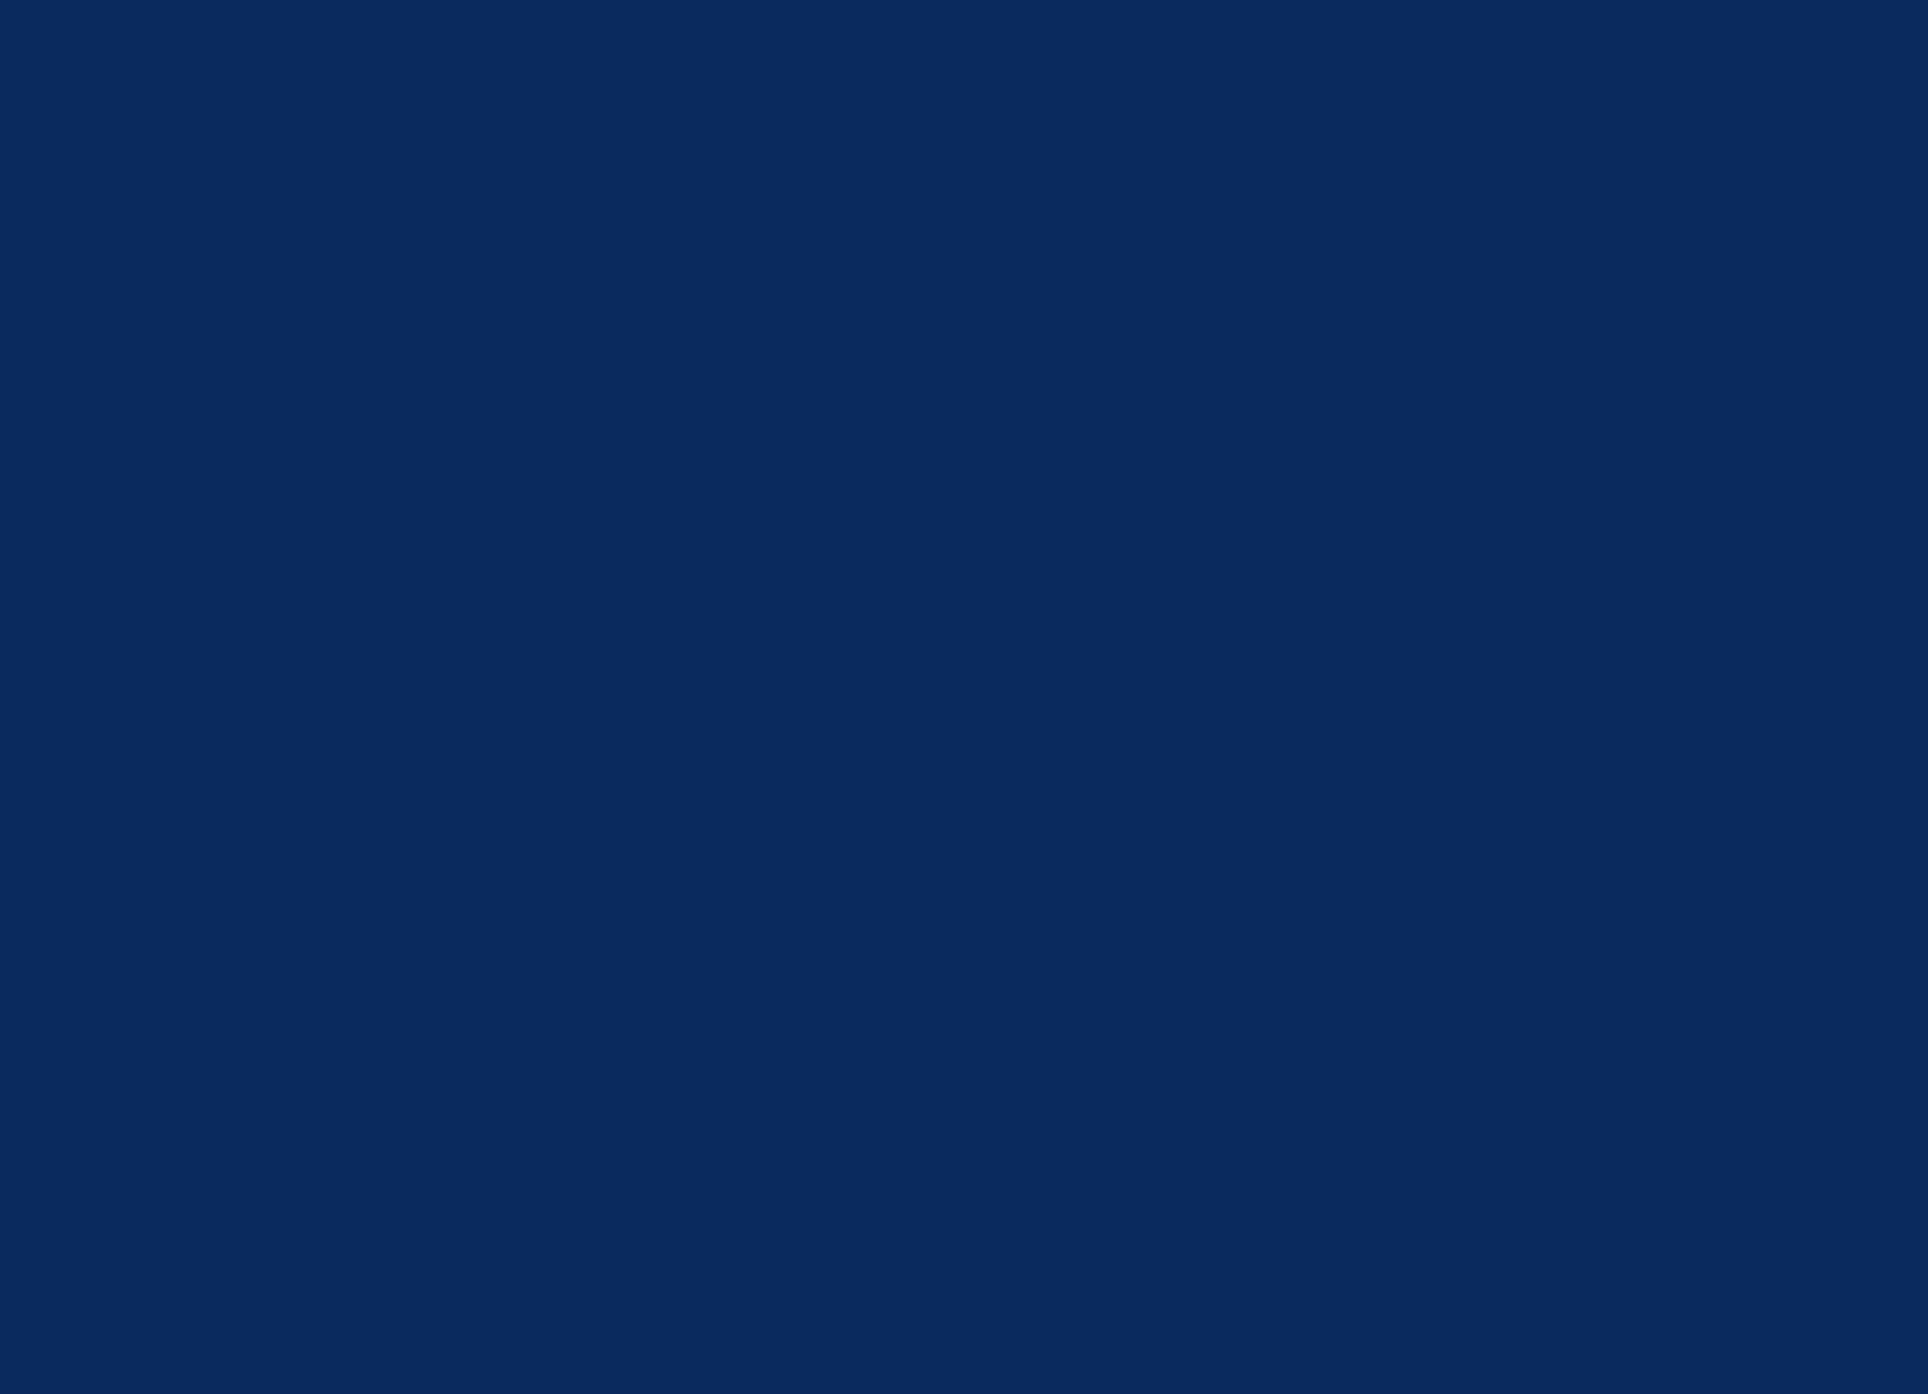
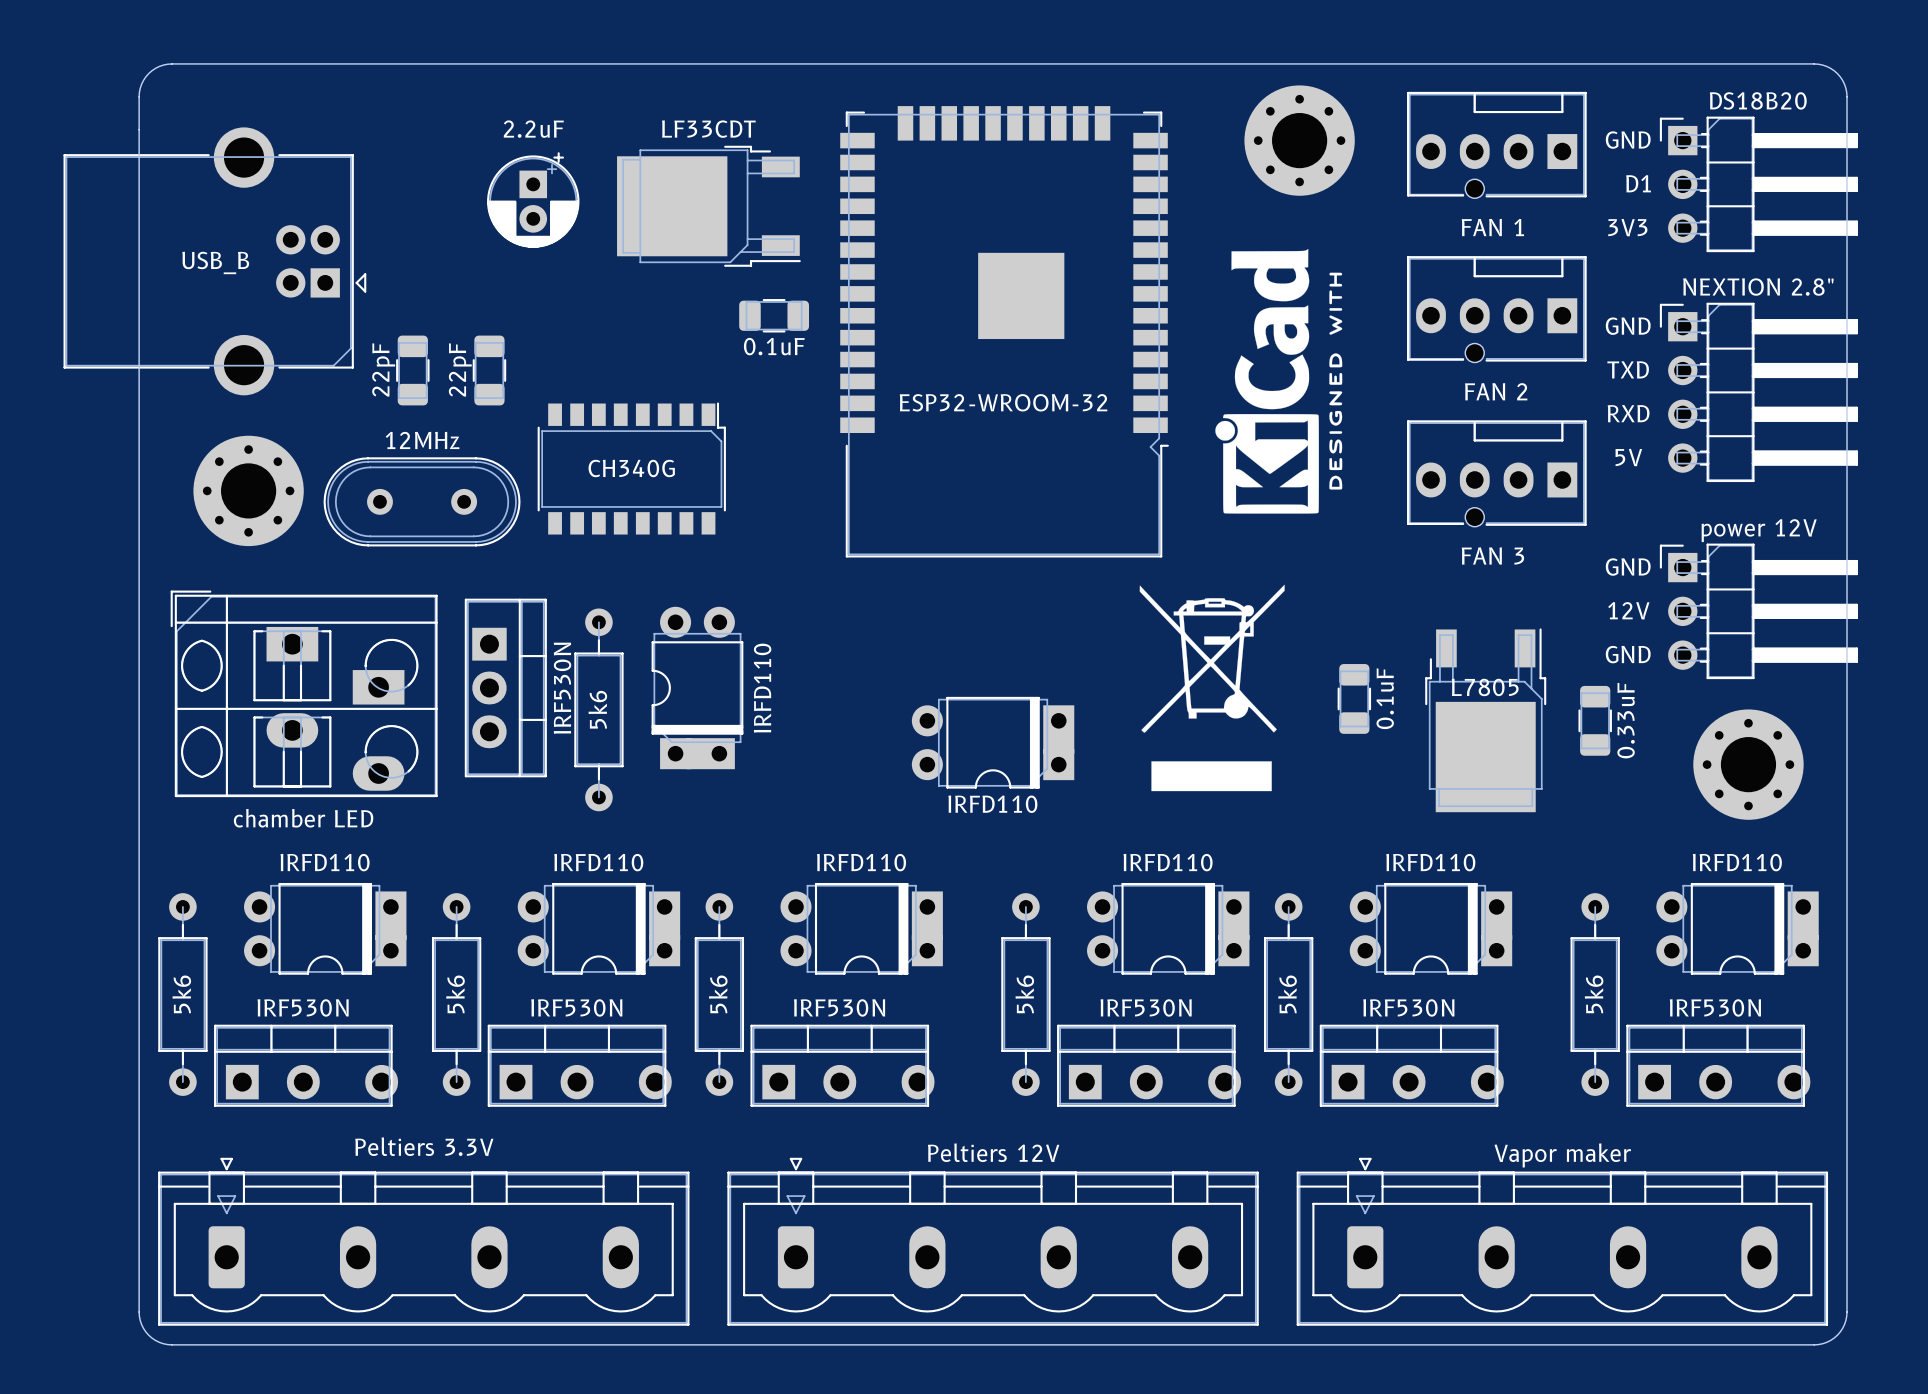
board edge: none -> (171, 63) (1814, 63) (1826, 66) (1834, 70) (1842, 80) (1847, 96) (1847, 1312) (1844, 1324) (1840, 1332) (1826, 1342) (1814, 1344) (171, 1344) (163, 1343) (151, 1338) (141, 1324) (139, 1312) (139, 96) (141, 84) (148, 73) (159, 66) (171, 63)
part: none -> (1299, 140)
text: none -> GND (1628, 140)
FAN 1: none -> (1496, 145)
drawing: none -> [1752, 176, 1858, 192]
text: none -> D1 (1638, 183)
DS18B20: none -> (1758, 184)
2.2uF: none -> (533, 200)
LF33CDT: none -> (708, 206)
drawing: none -> [1752, 220, 1858, 236]
text: none -> 3V3 (1627, 227)
drawing: none -> [1215, 249, 1343, 514]
USB_B: none -> (214, 261)
FAN 2: none -> (1496, 309)
0.1uF: none -> (774, 315)
text: none -> GND (1628, 326)
ESP32-WROOM-32: none -> (1004, 331)
drawing: none -> [1752, 363, 1858, 378]
text: none -> TXD (1628, 369)
22pF: none -> (412, 370)
22pF: none -> (489, 370)
NEXTION 2.8": none -> (1758, 392)
drawing: none -> [1752, 406, 1858, 422]
text: none -> RXD (1628, 413)
drawing: none -> [1752, 450, 1858, 466]
text: none -> 5V (1628, 457)
CH340G: none -> (631, 468)
FAN 3: none -> (1496, 473)
part: none -> (248, 490)
12MHz: none -> (422, 501)
text: none -> GND (1628, 567)
drawing: none -> [1139, 584, 1285, 792]
drawing: none -> [1752, 603, 1858, 619]
text: none -> 12V (1628, 610)
power 12V: none -> (1758, 611)
drawing: none -> [1752, 647, 1858, 663]
text: none -> GND (1628, 654)
IRF530N: none -> (505, 687)
IRFD110: none -> (697, 687)
chamber LED: none -> (304, 693)
0.1uF: none -> (1354, 698)
5k6: none -> (598, 709)
L7805: none -> (1485, 720)
0.33uF: none -> (1595, 720)
IRFD110: none -> (993, 742)
part: none -> (1748, 764)
IRFD110: none -> (325, 928)
IRFD110: none -> (598, 928)
IRFD110: none -> (861, 928)
IRFD110: none -> (1168, 928)
IRFD110: none -> (1430, 928)
IRFD110: none -> (1737, 928)
5k6: none -> (182, 994)
5k6: none -> (456, 994)
5k6: none -> (719, 994)
5k6: none -> (1025, 994)
5k6: none -> (1288, 994)
5k6: none -> (1595, 994)
IRF530N: none -> (306, 1065)
IRF530N: none -> (579, 1065)
IRF530N: none -> (842, 1065)
IRF530N: none -> (1149, 1065)
IRF530N: none -> (1411, 1065)
IRF530N: none -> (1718, 1065)
Peltiers 3.3V: none -> (423, 1241)
Peltiers 12V: none -> (993, 1241)
Vapor maker: none -> (1562, 1241)

